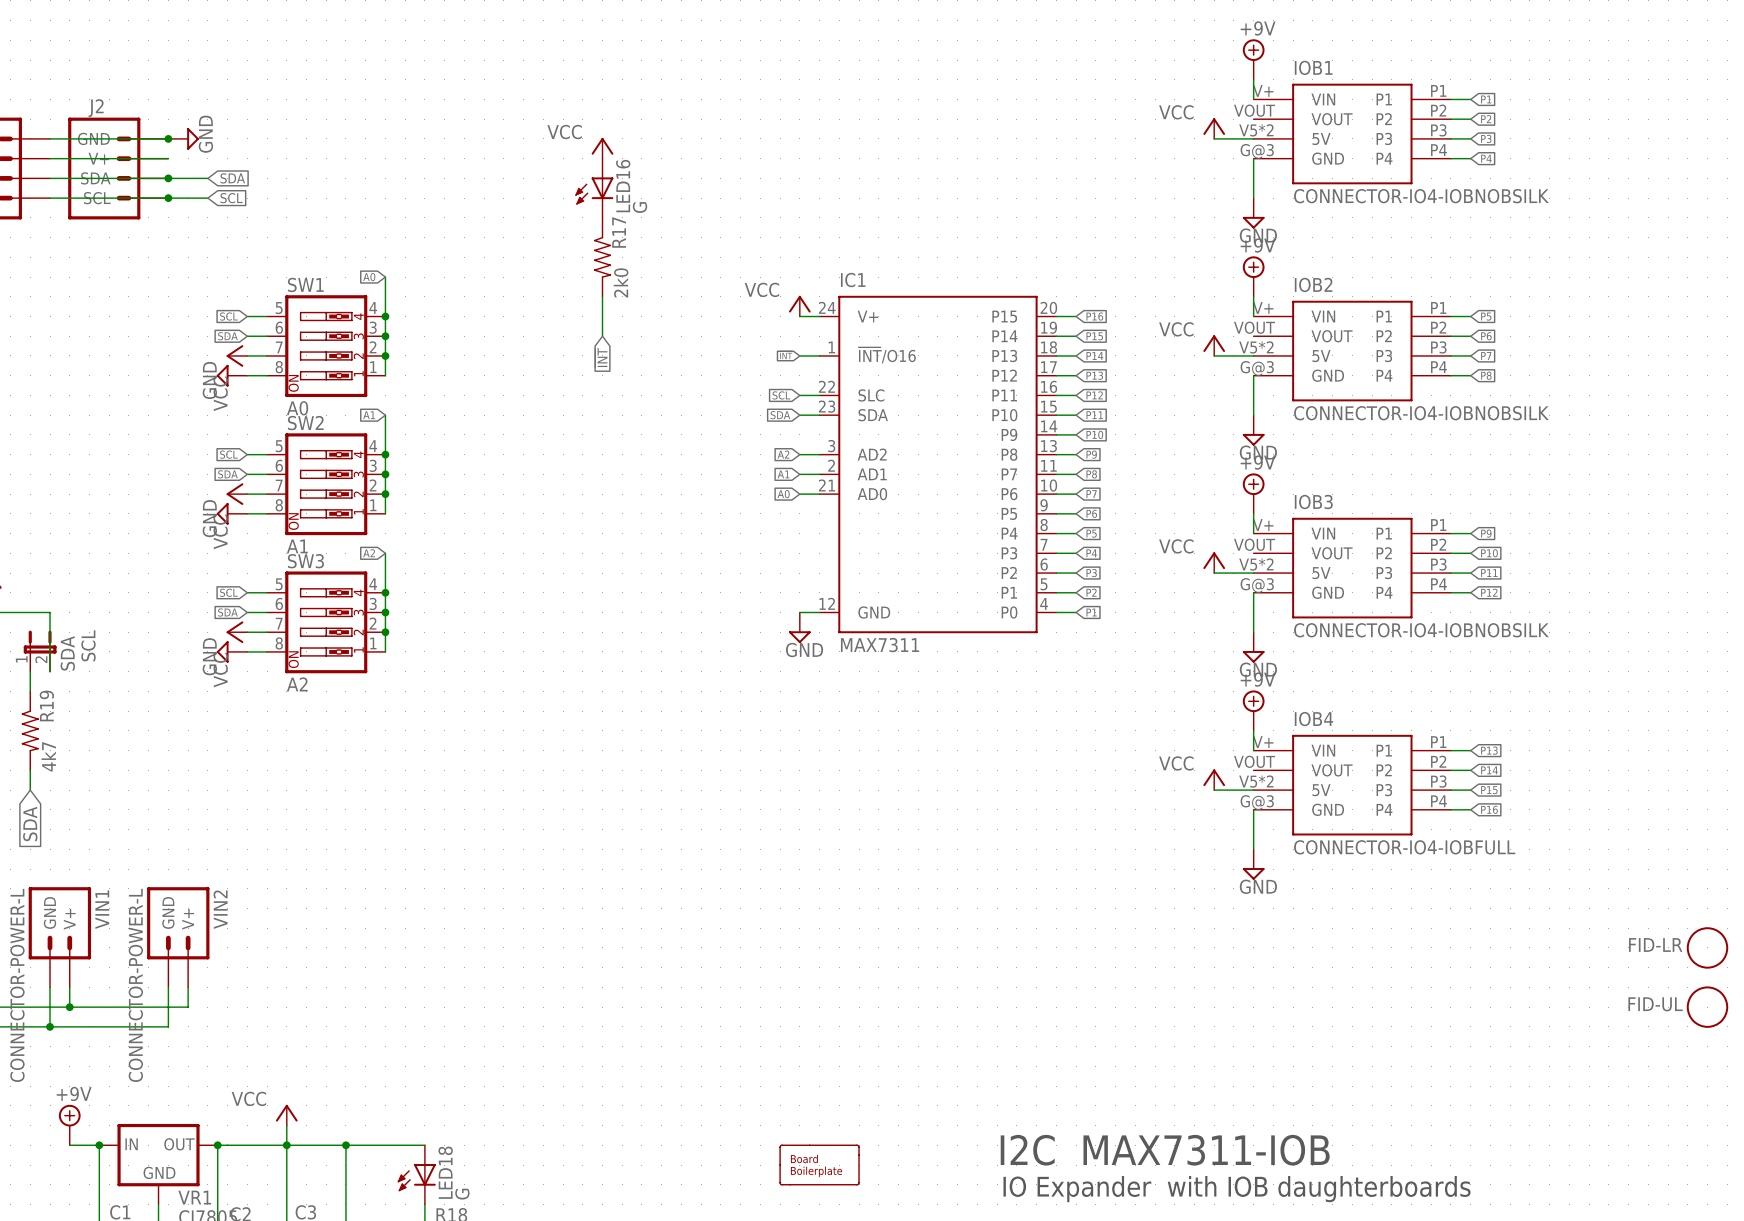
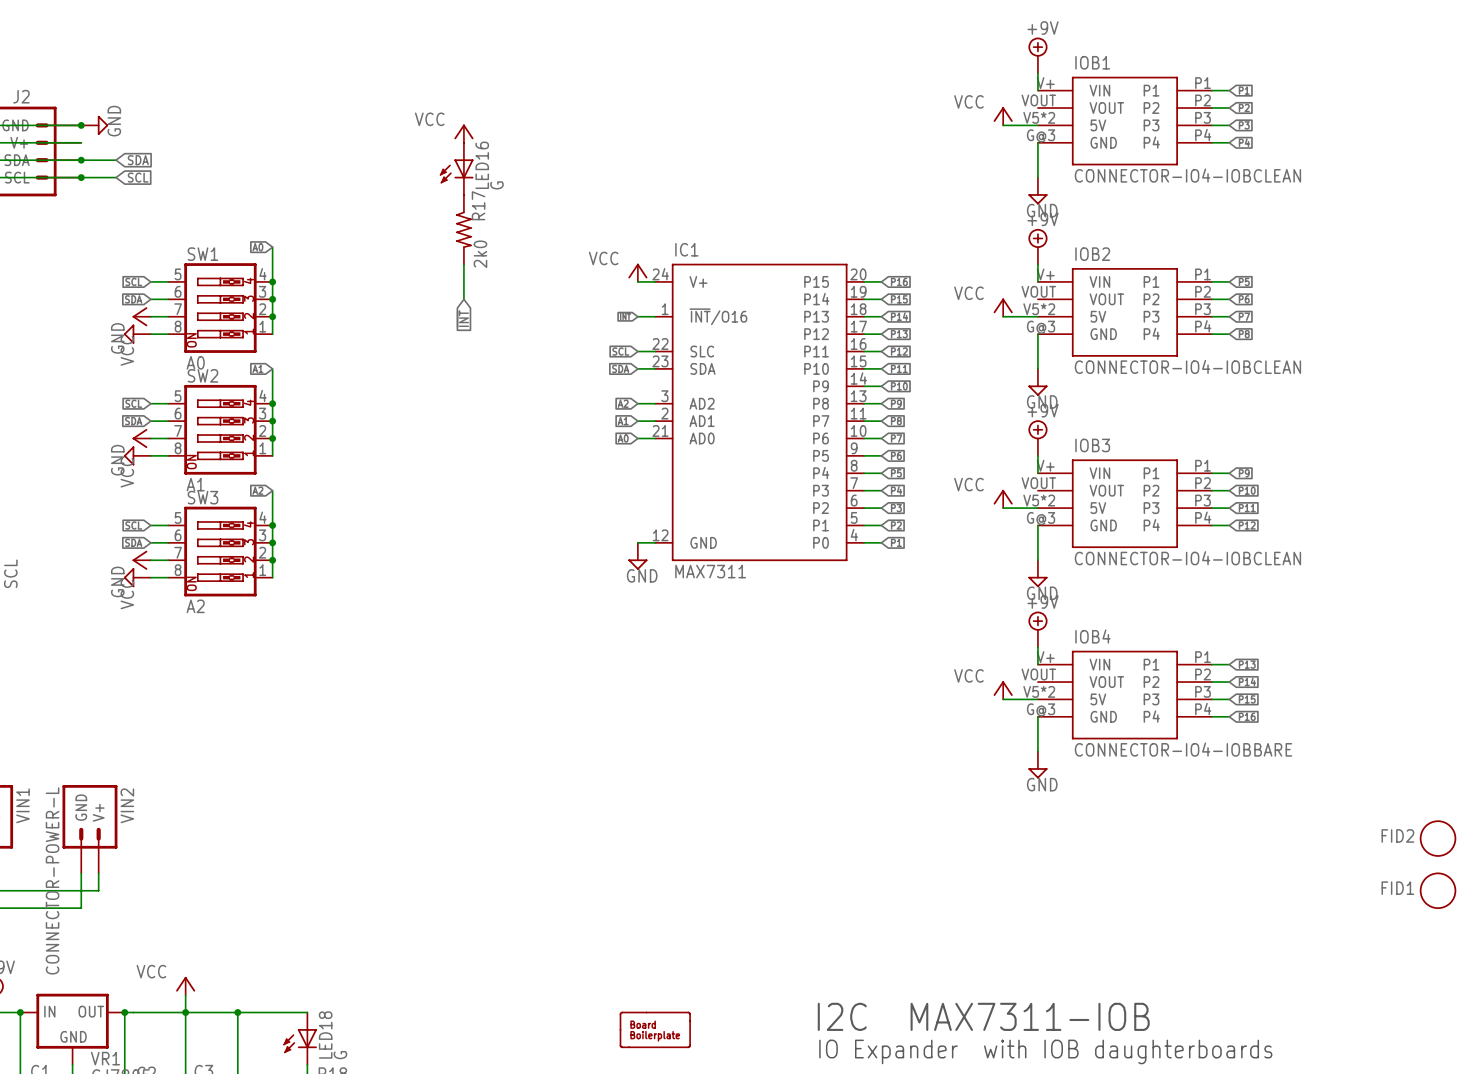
IOB1 value: CONNECTOR-IO4-IOBNOBSILK (1421, 196) -> CONNECTOR-IO4-IOBCLEAN (1187, 175)
IOB2 value: CONNECTOR-IO4-IOBNOBSILK (1421, 413) -> CONNECTOR-IO4-IOBCLEAN (1187, 366)
IOB3 value: CONNECTOR-IO4-IOBNOBSILK (1421, 630) -> CONNECTOR-IO4-IOBCLEAN (1187, 558)
IOB4 value: CONNECTOR-IO4-IOBFULL (1404, 847) -> CONNECTOR-IO4-IOBBARE (1183, 749)
FID-LR name: FID-LR (1655, 944) -> FID2 (1397, 835)
FID-UL name: FID-UL (1655, 1004) -> FID1 (1397, 888)

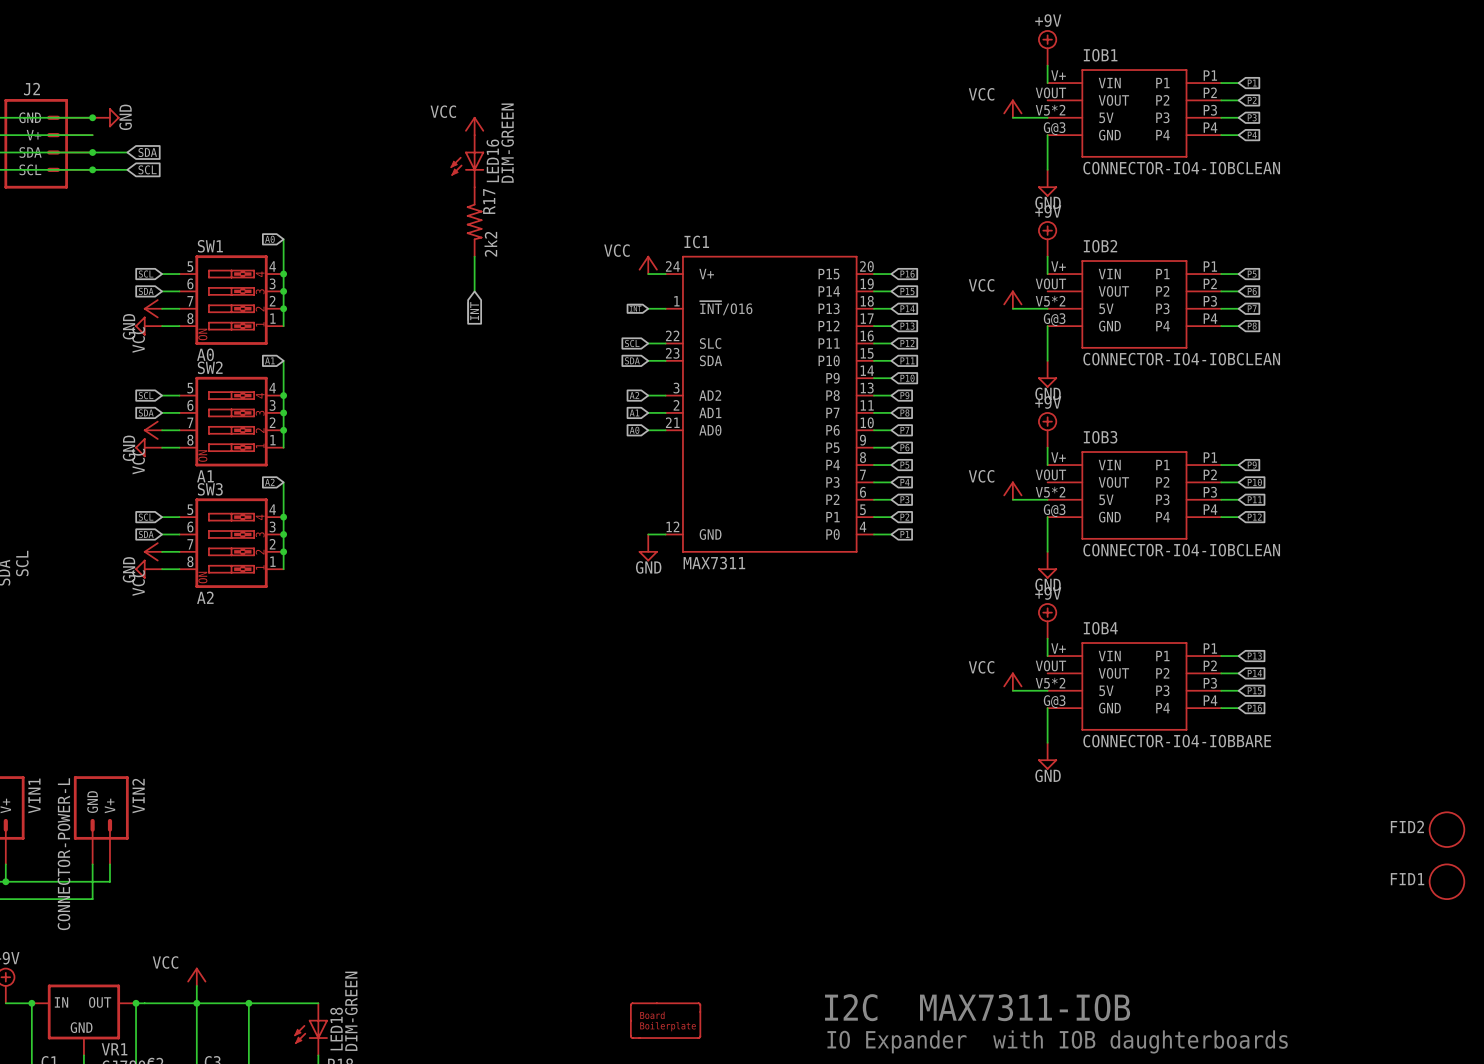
LED16 value: G (496, 185) -> DIM-GREEN (507, 143)
R17 value: 2k0 (480, 254) -> 2k2 (490, 244)
LED18 value: G (340, 1055) -> DIM-GREEN (351, 1011)

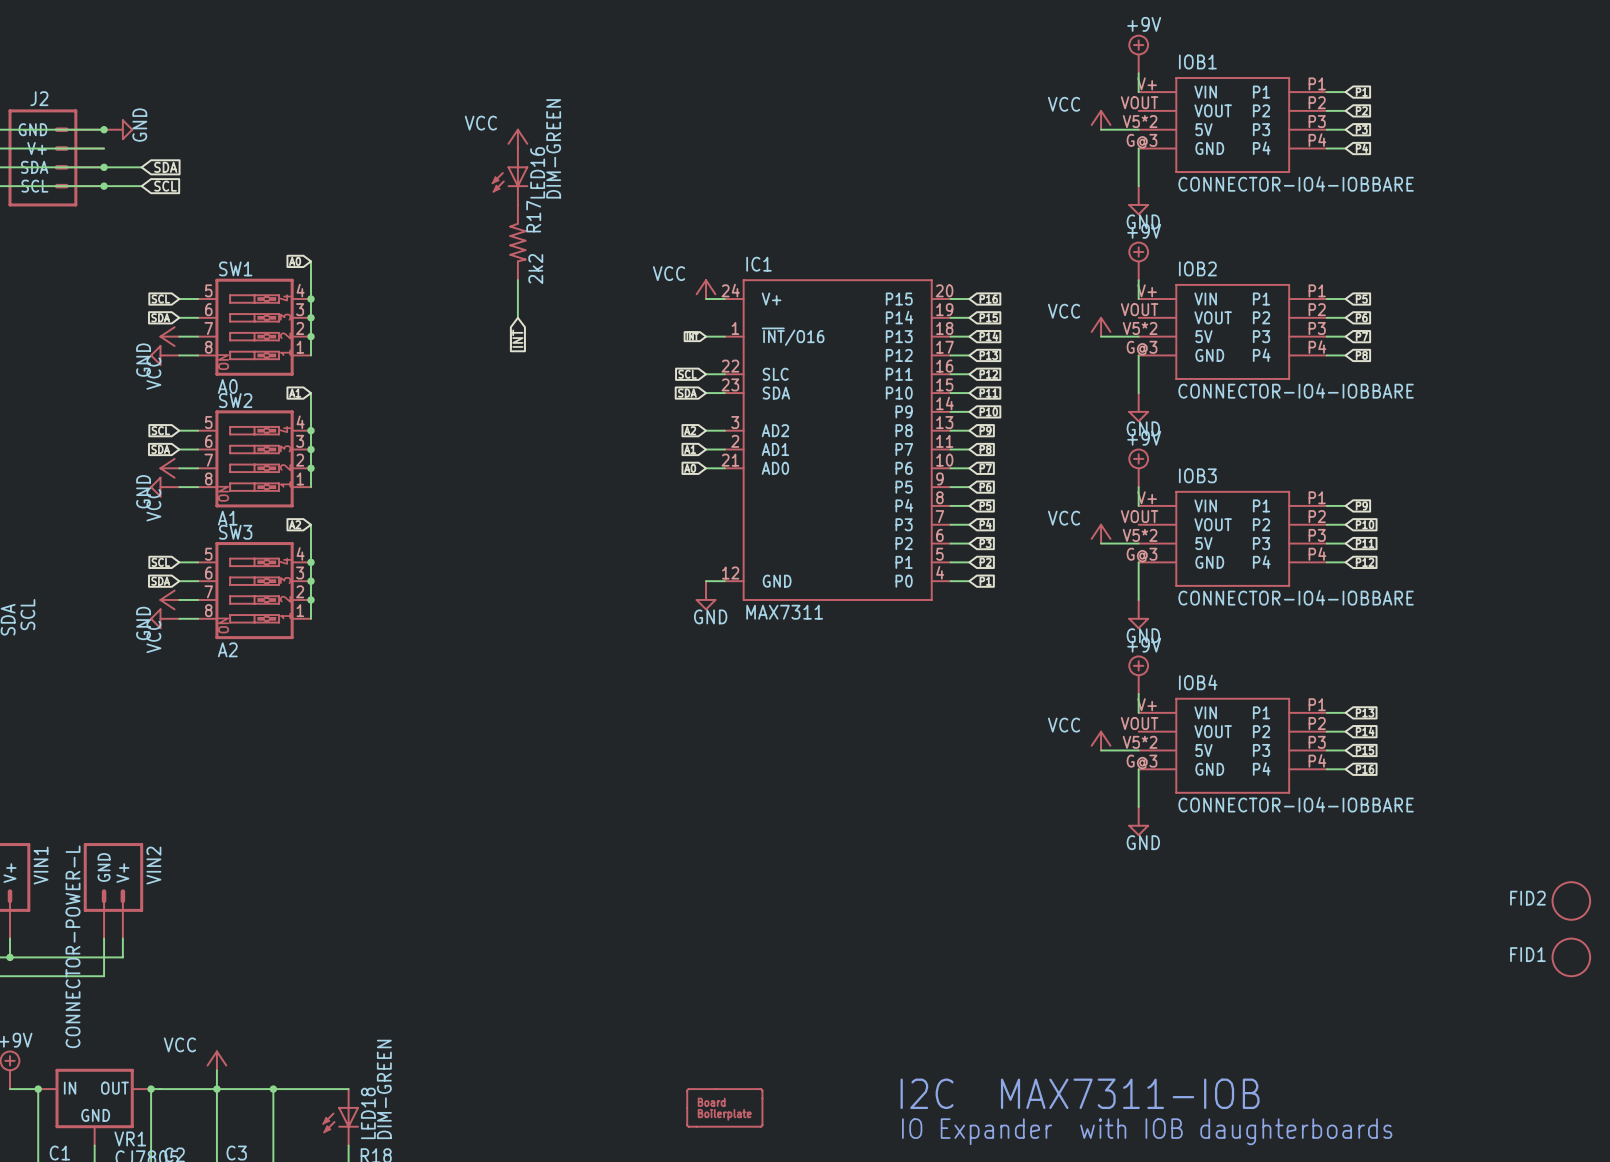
IOB1 value: CONNECTOR-IO4-IOBCLEAN (1181, 168) -> CONNECTOR-IO4-IOBBARE (1296, 183)
IOB2 value: CONNECTOR-IO4-IOBCLEAN (1181, 359) -> CONNECTOR-IO4-IOBBARE (1296, 390)
IOB3 value: CONNECTOR-IO4-IOBCLEAN (1181, 550) -> CONNECTOR-IO4-IOBBARE (1296, 597)

